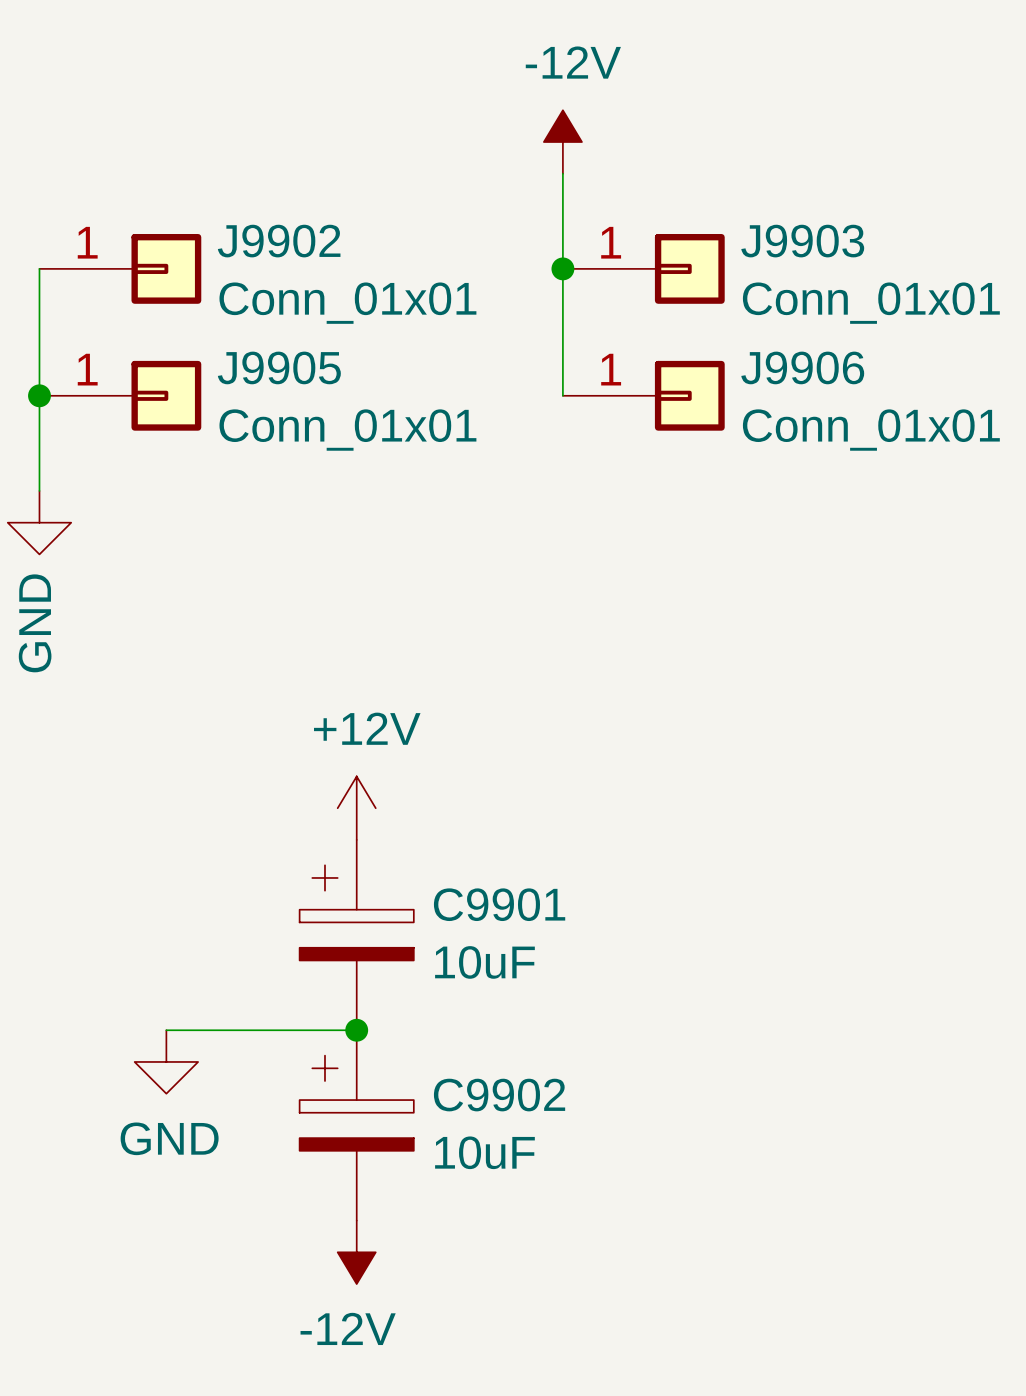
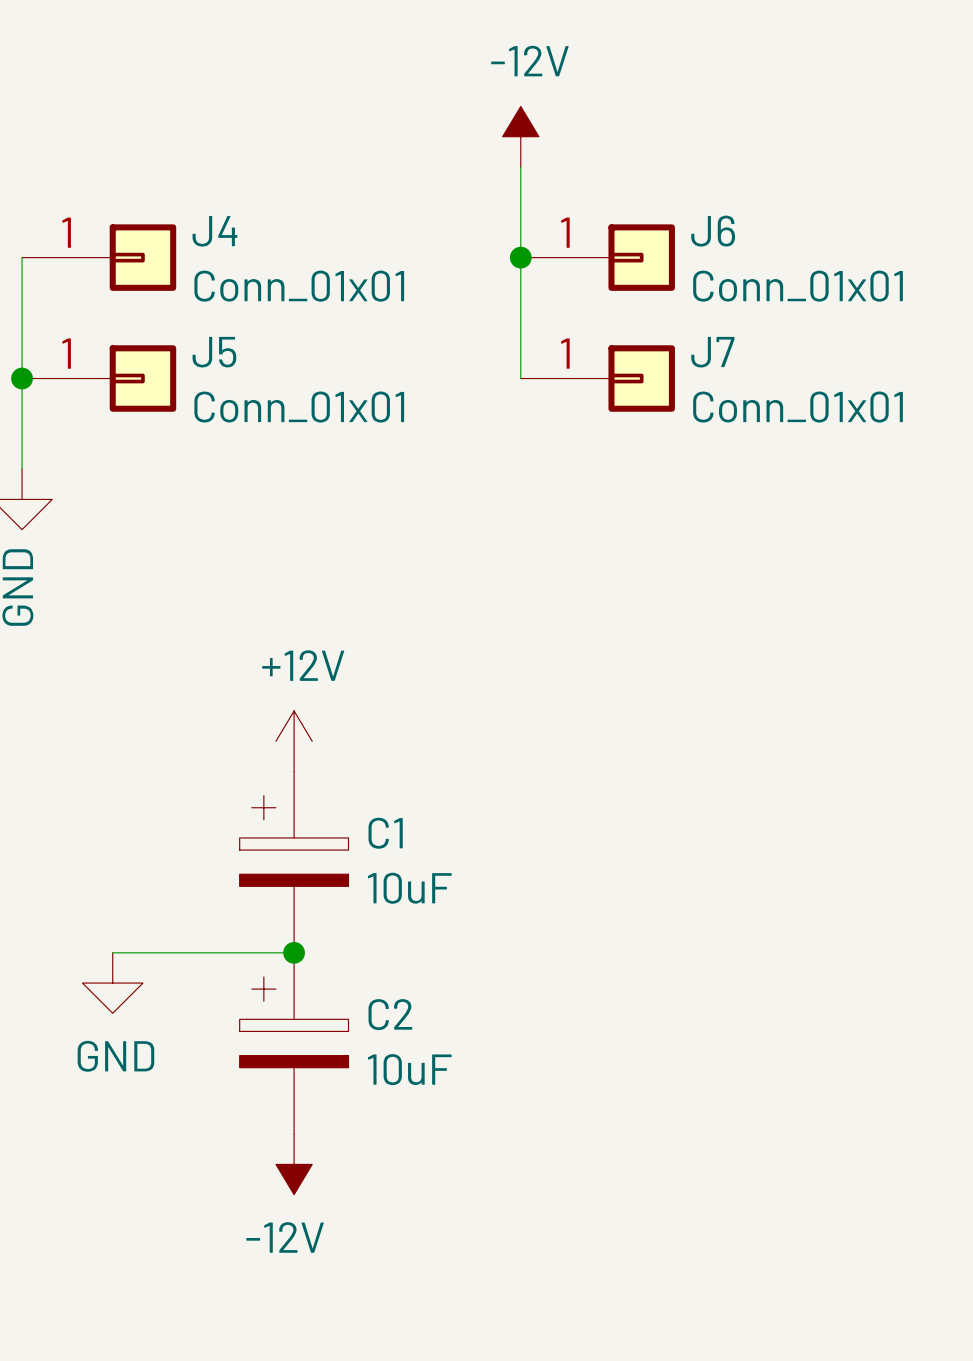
J9902 name: J9902 (279, 241) -> J4 (214, 231)
J9903 name: J9903 (802, 241) -> J6 (713, 231)
J9905 name: J9905 (279, 367) -> J5 (214, 352)
J9906 name: J9906 (802, 367) -> J7 (712, 352)
power symbol position: +12V (356, 808) -> +12V (294, 741)
C1: none -> 10uF (294, 862)
C9901: 10uF (356, 935) -> none
wire: (166, 1030) (356, 1030) -> (112, 952) (294, 952)
junction position: (356, 1030) -> (294, 952)
power symbol position: GND (166, 1061) -> GND (112, 983)
C2: none -> 10uF (294, 1043)
C9902: 10uF (356, 1125) -> none
power symbol position: -12V (356, 1252) -> -12V (294, 1164)

